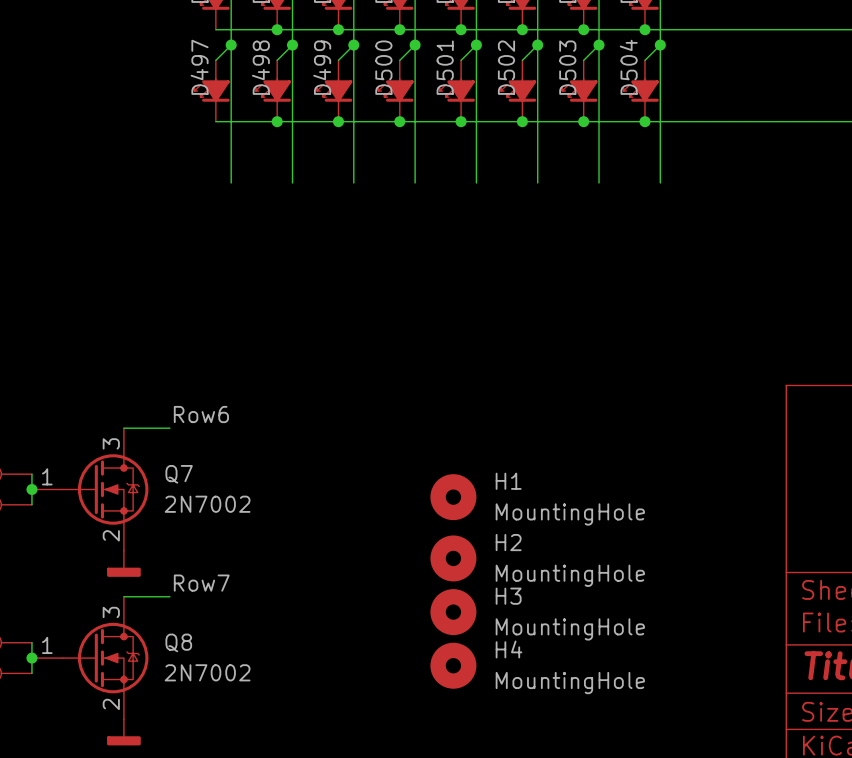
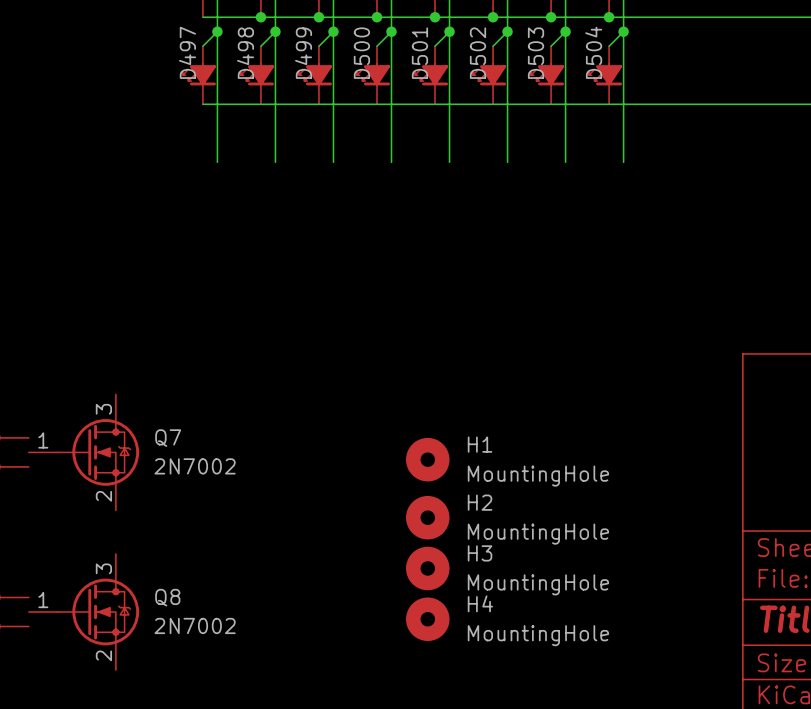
junction: (277, 121) -> none
junction: (338, 121) -> none
junction: (399, 121) -> none
junction: (461, 121) -> none
junction: (522, 121) -> none
junction: (583, 121) -> none
junction: (644, 121) -> none
label: Row6 (201, 414) -> none
wire: (123, 428) (169, 428) -> none
wire: (31, 474) (31, 504) -> none
junction: (31, 489) -> none
power symbol: (123, 563) -> none
label: Row7 (201, 583) -> none
wire: (123, 596) (169, 596) -> none
wire: (31, 642) (31, 673) -> none
junction: (31, 658) -> none
power symbol: (123, 732) -> none

